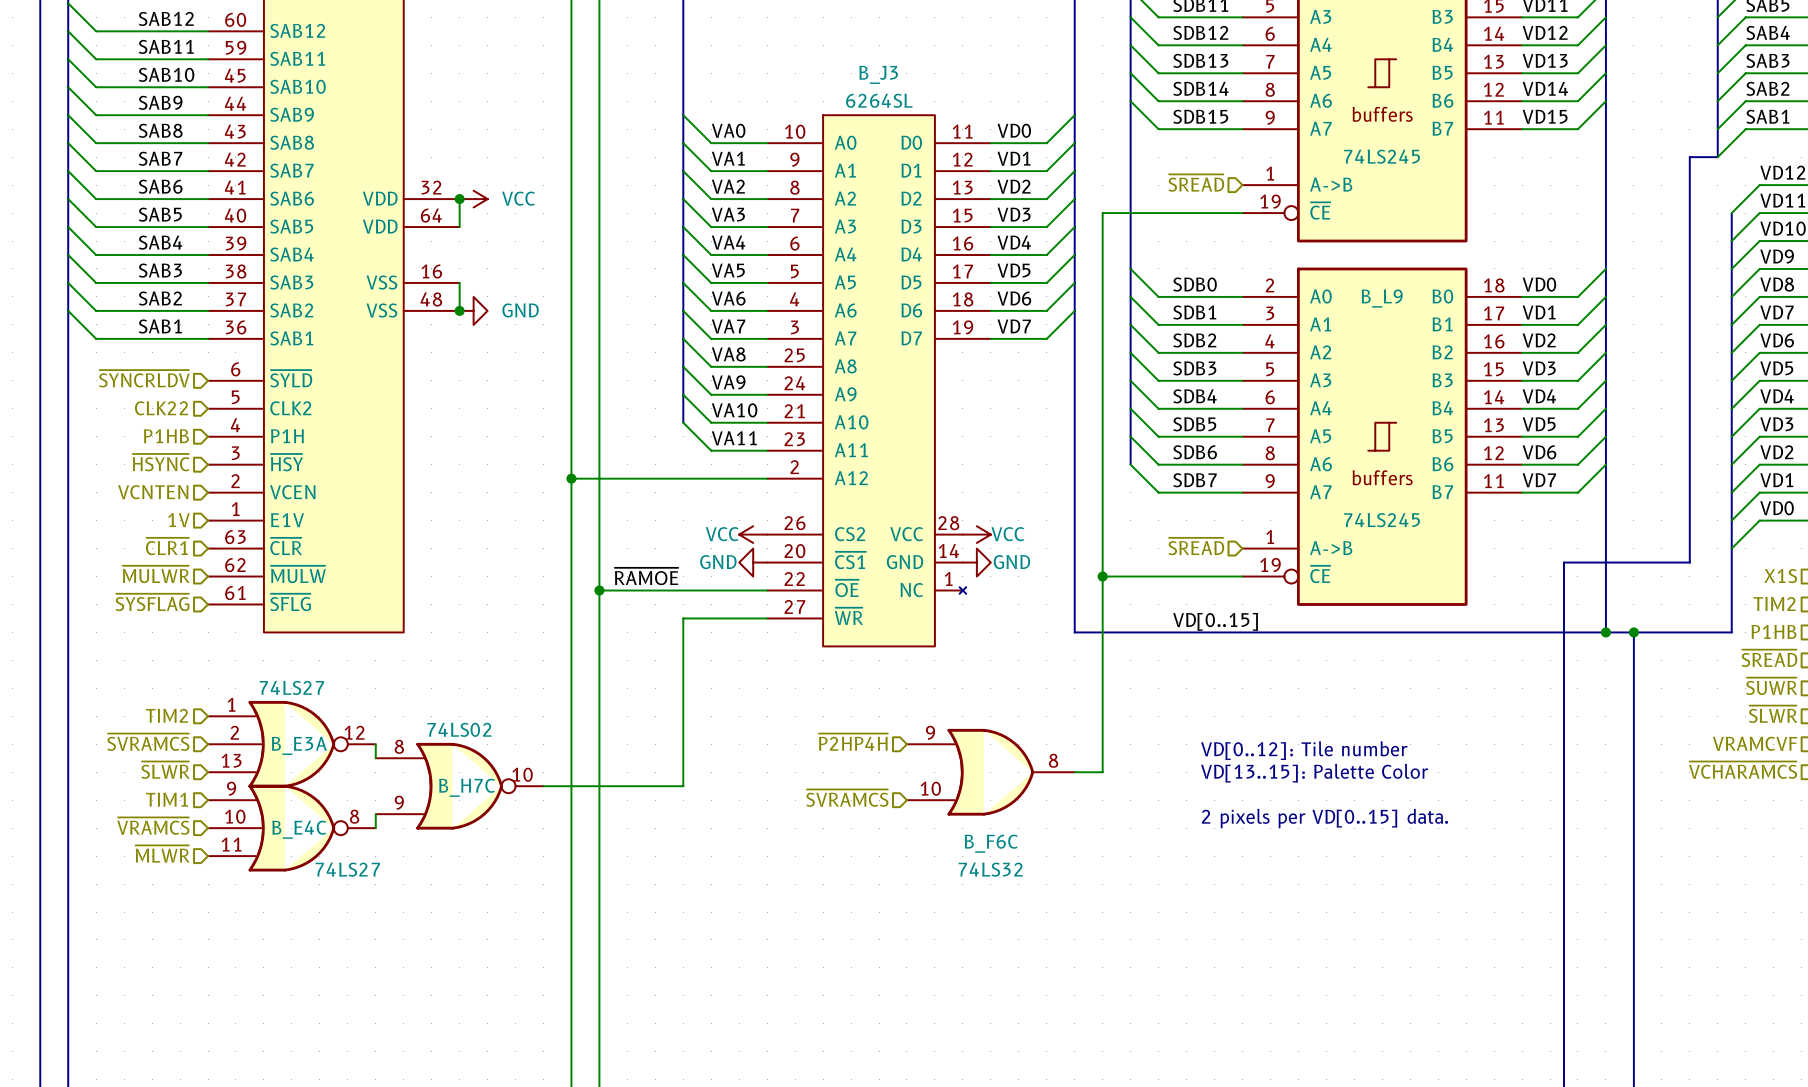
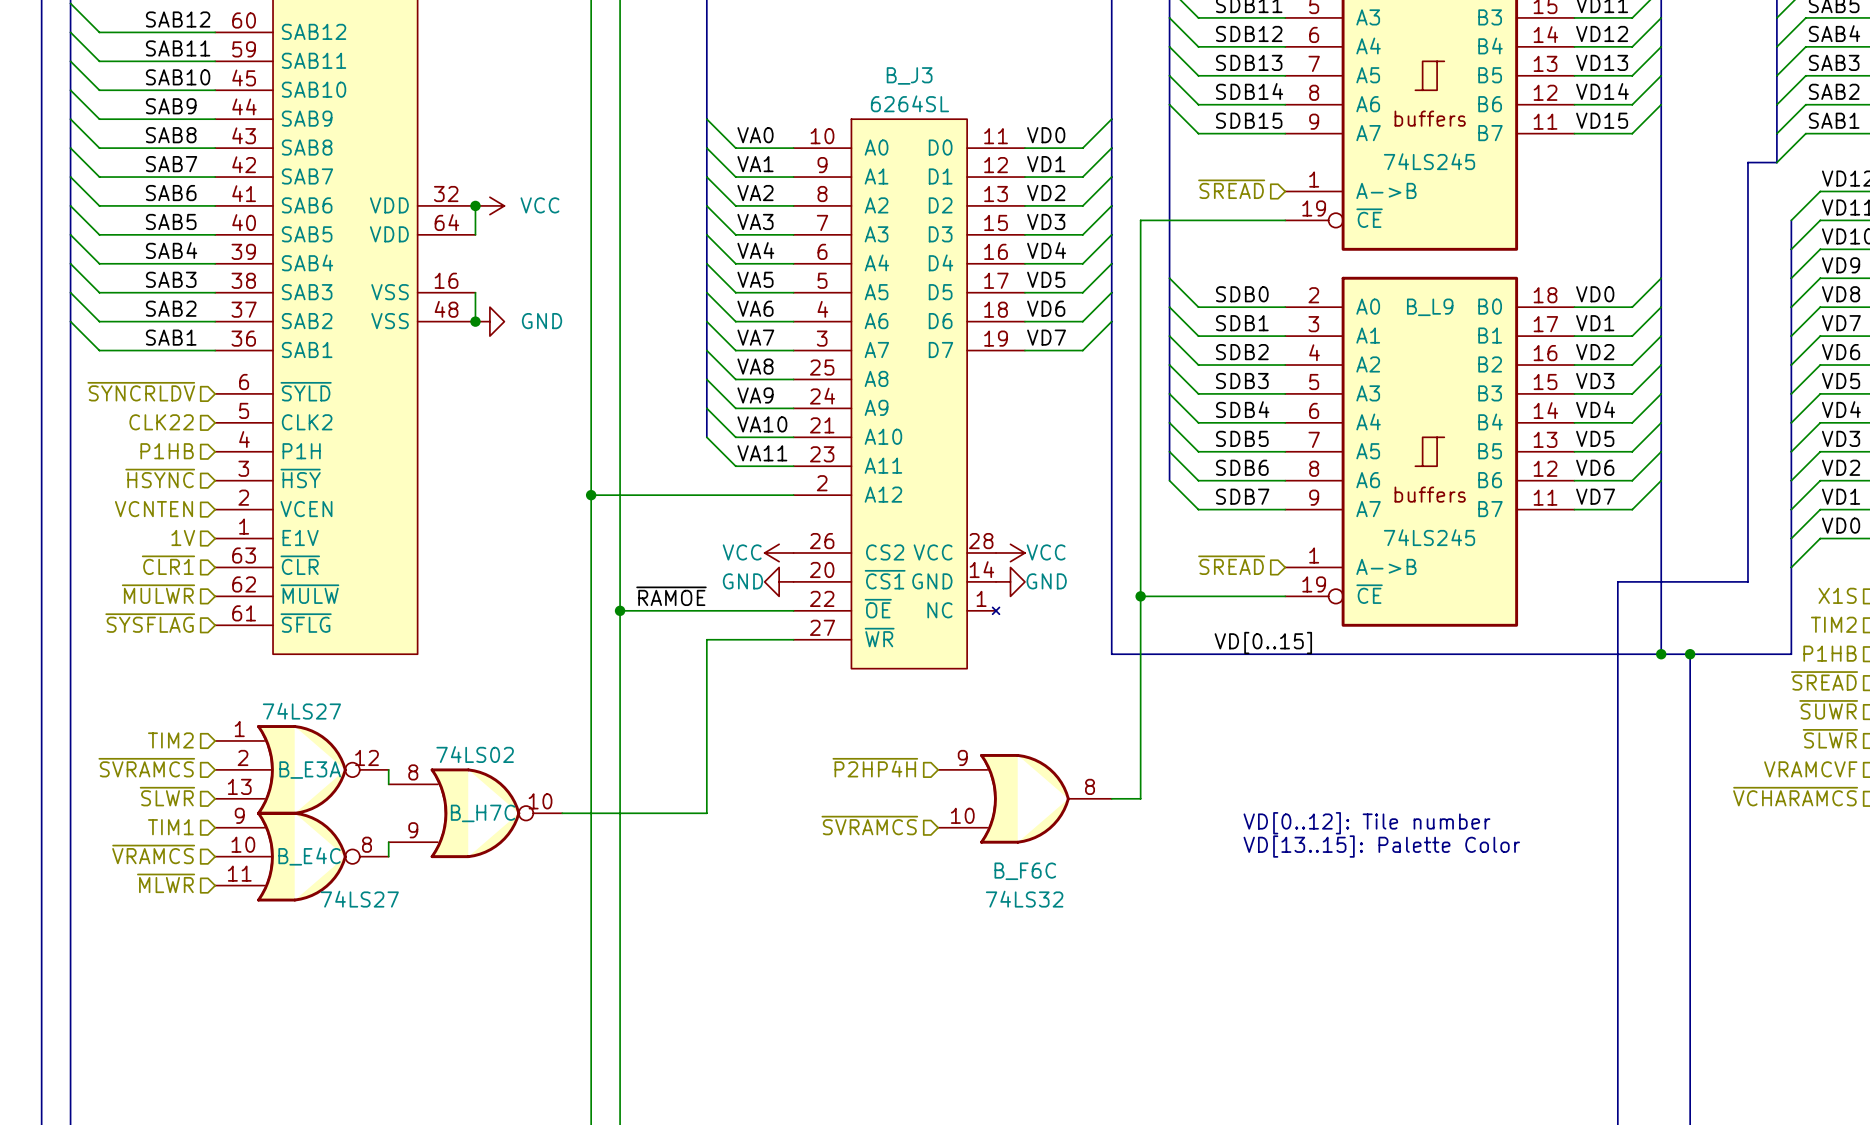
text position: VD[0..12]: Tile number (1304, 750) -> VD[0..12]: Tile number (1366, 823)
text: VD[13..15]: Palette Color (1314, 773) -> none
text: 2 pixels per VD[0..15] data. (1325, 818) -> VD[13..15]: Palette Color (1381, 846)

